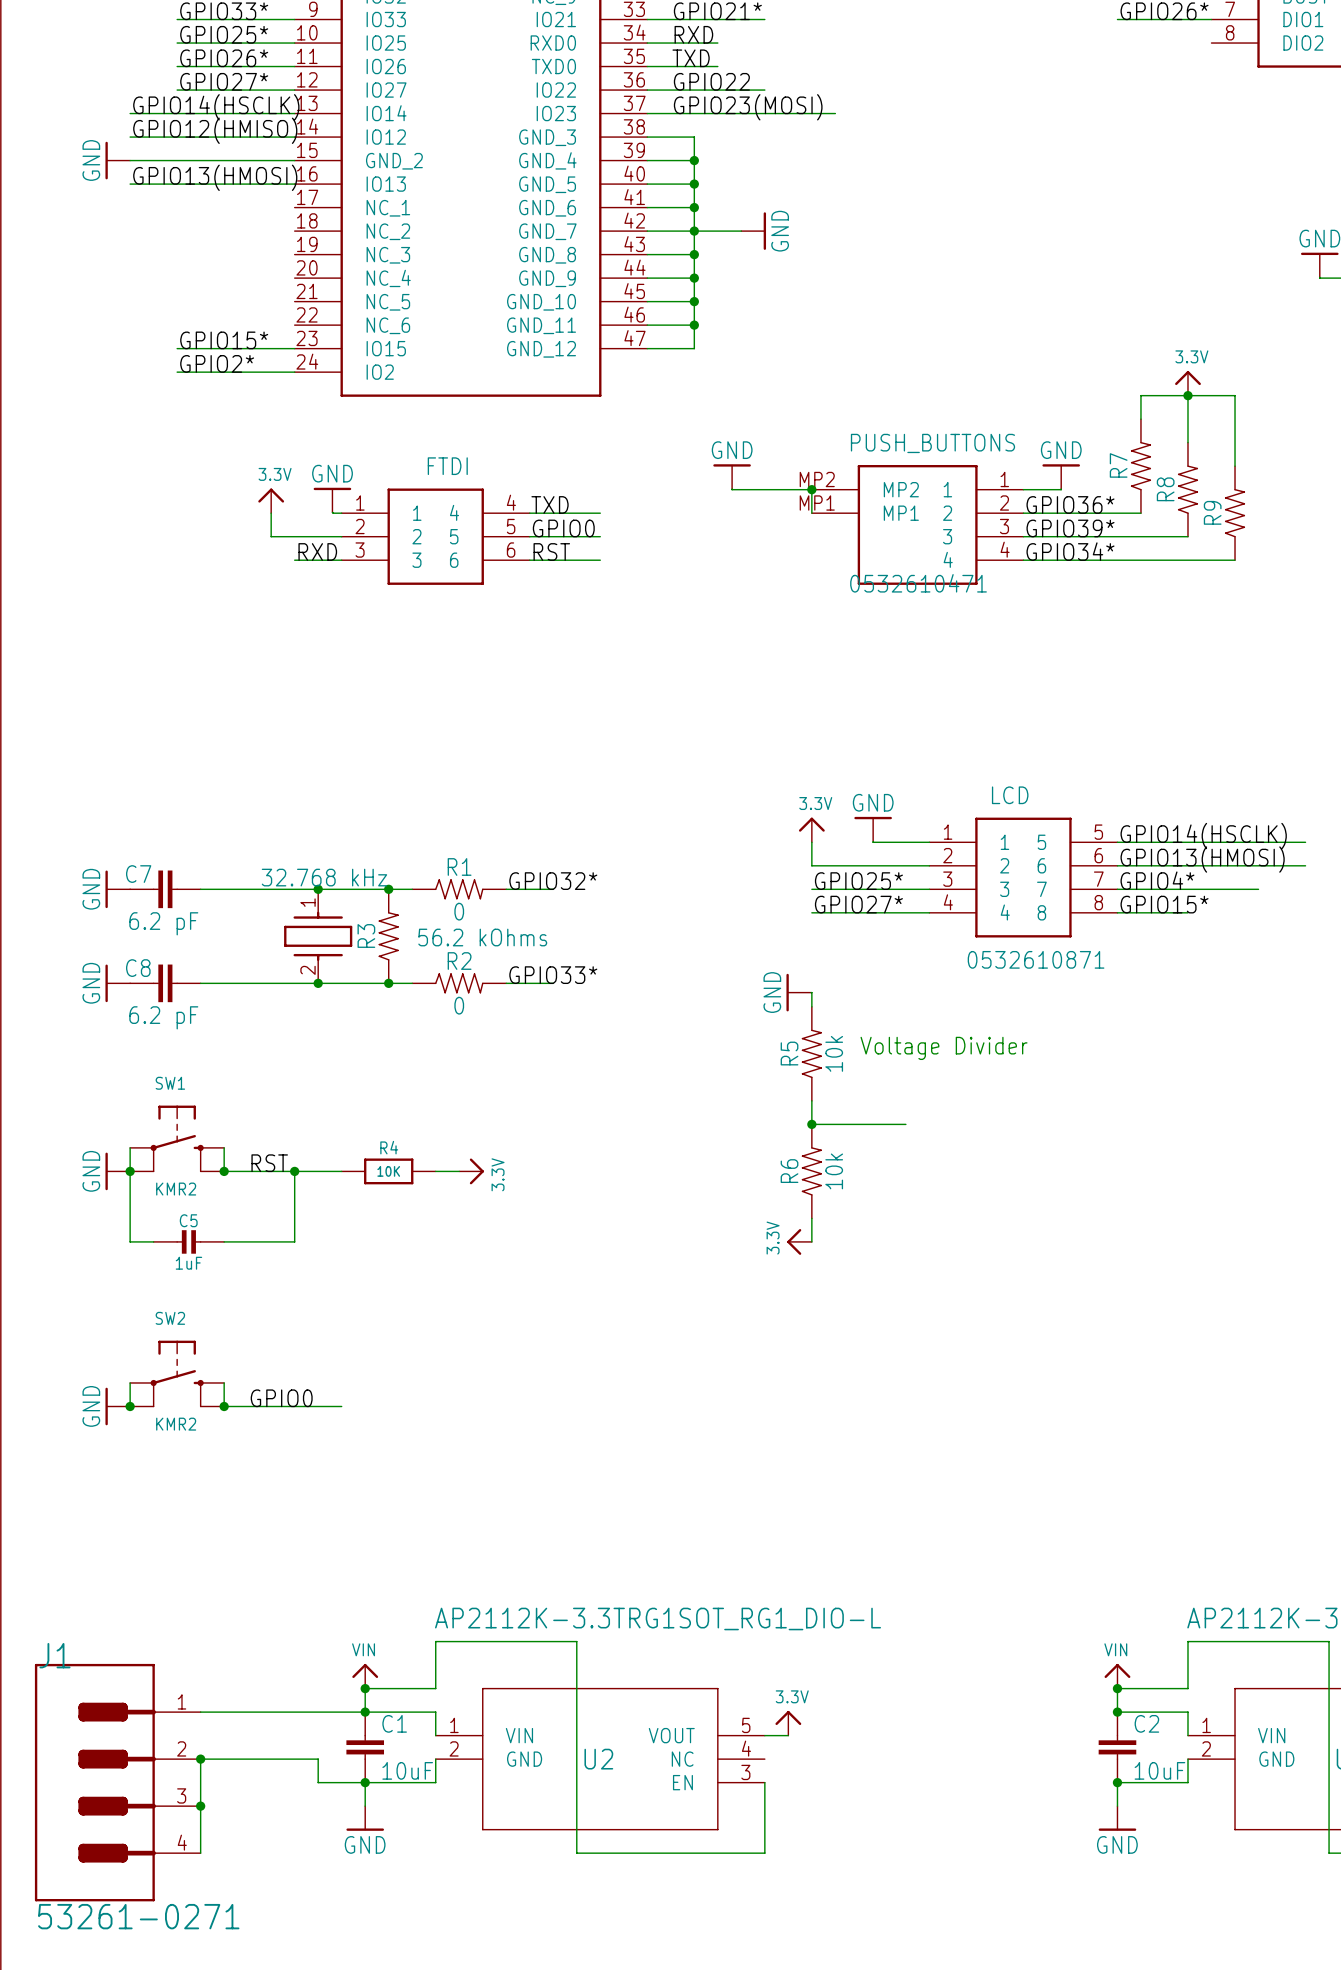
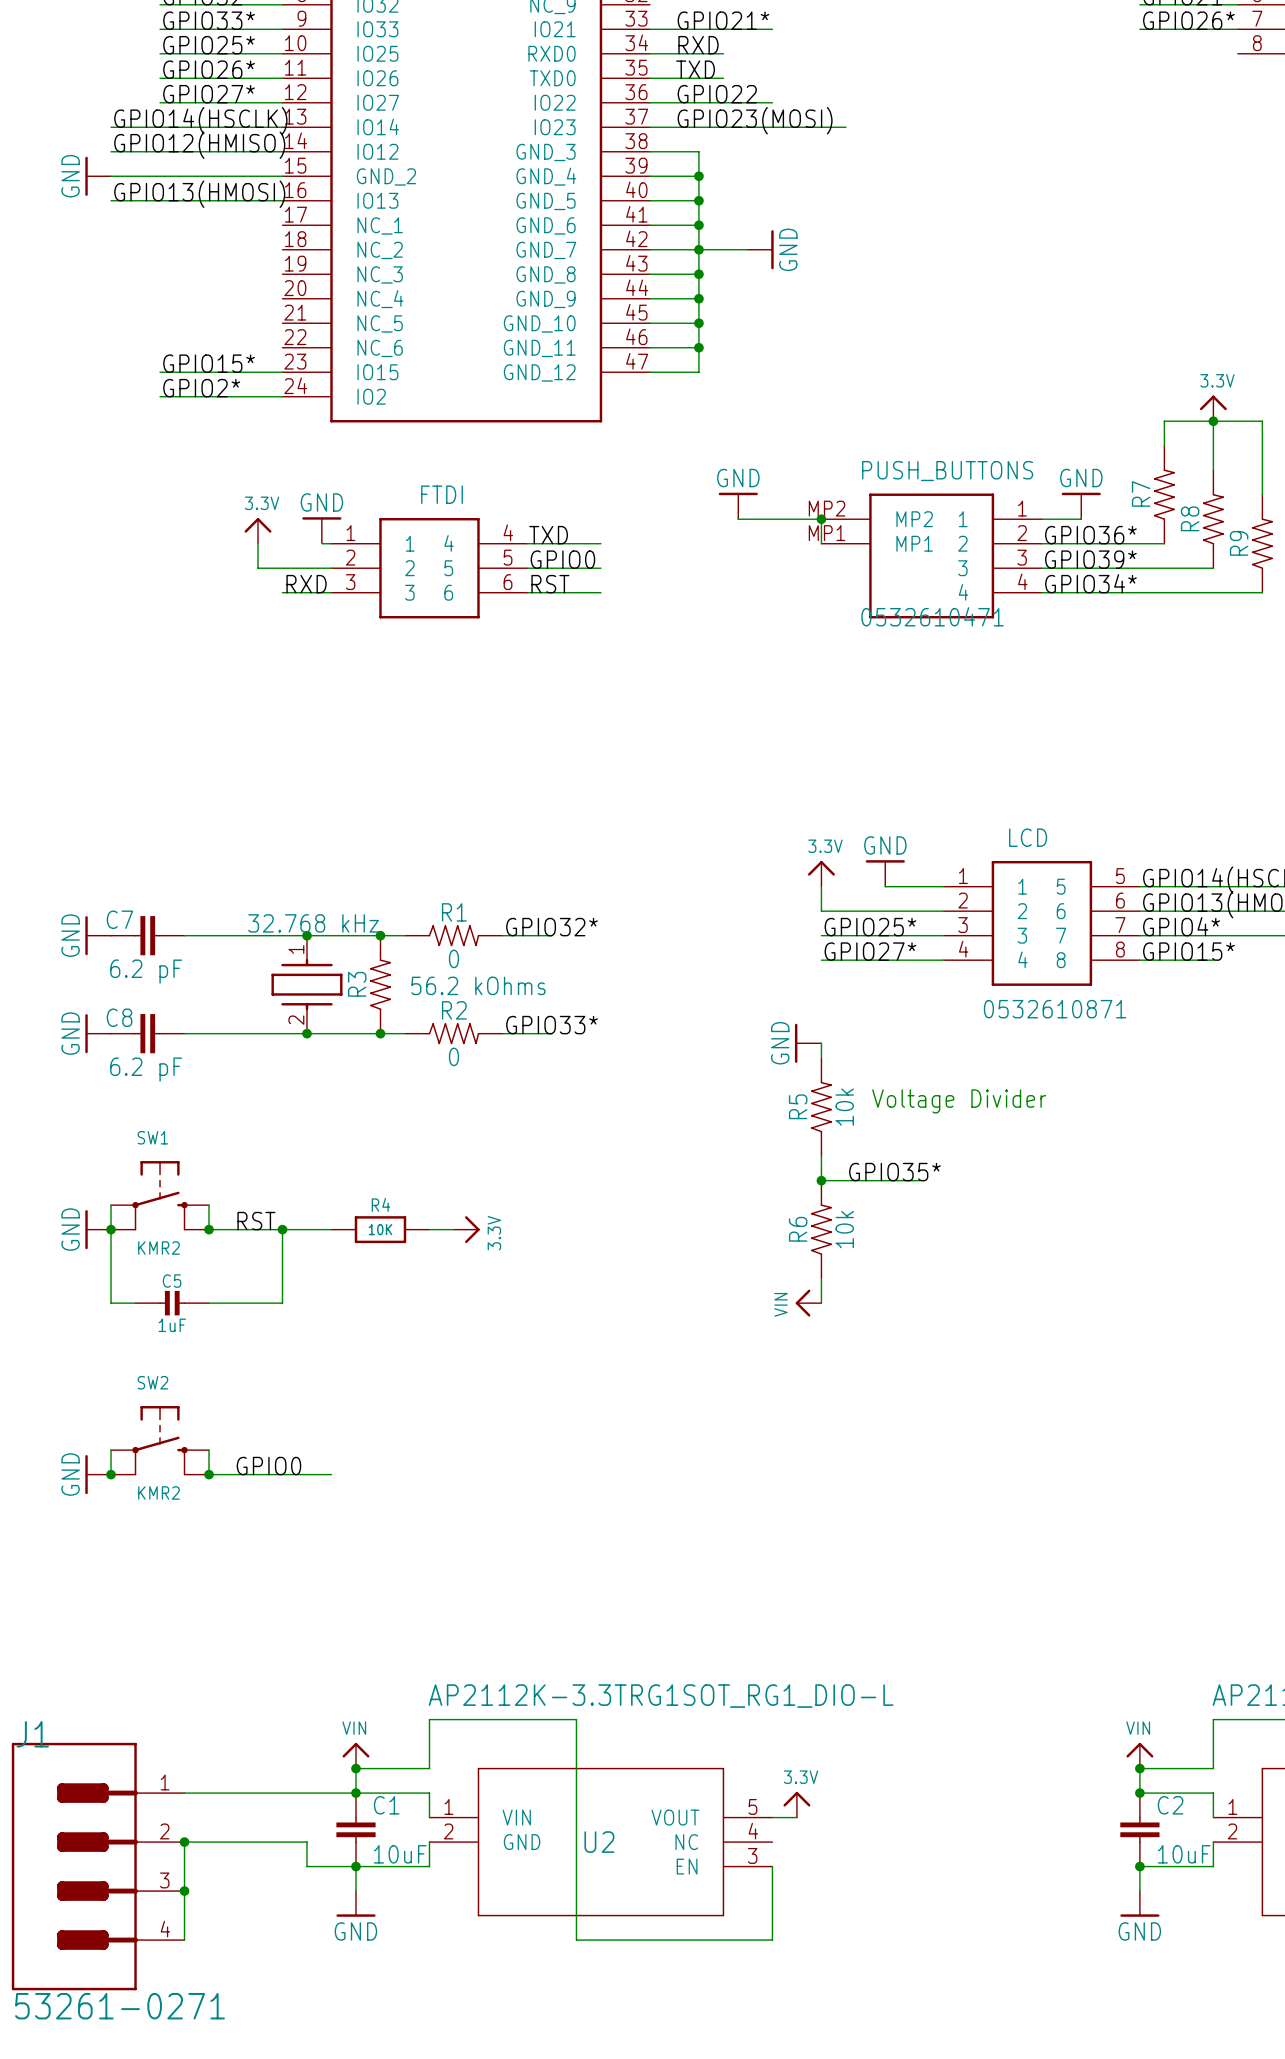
label: none -> GPIO35* (894, 1172)
power symbol: 3.3V (799, 1241) -> VIN (808, 1303)

